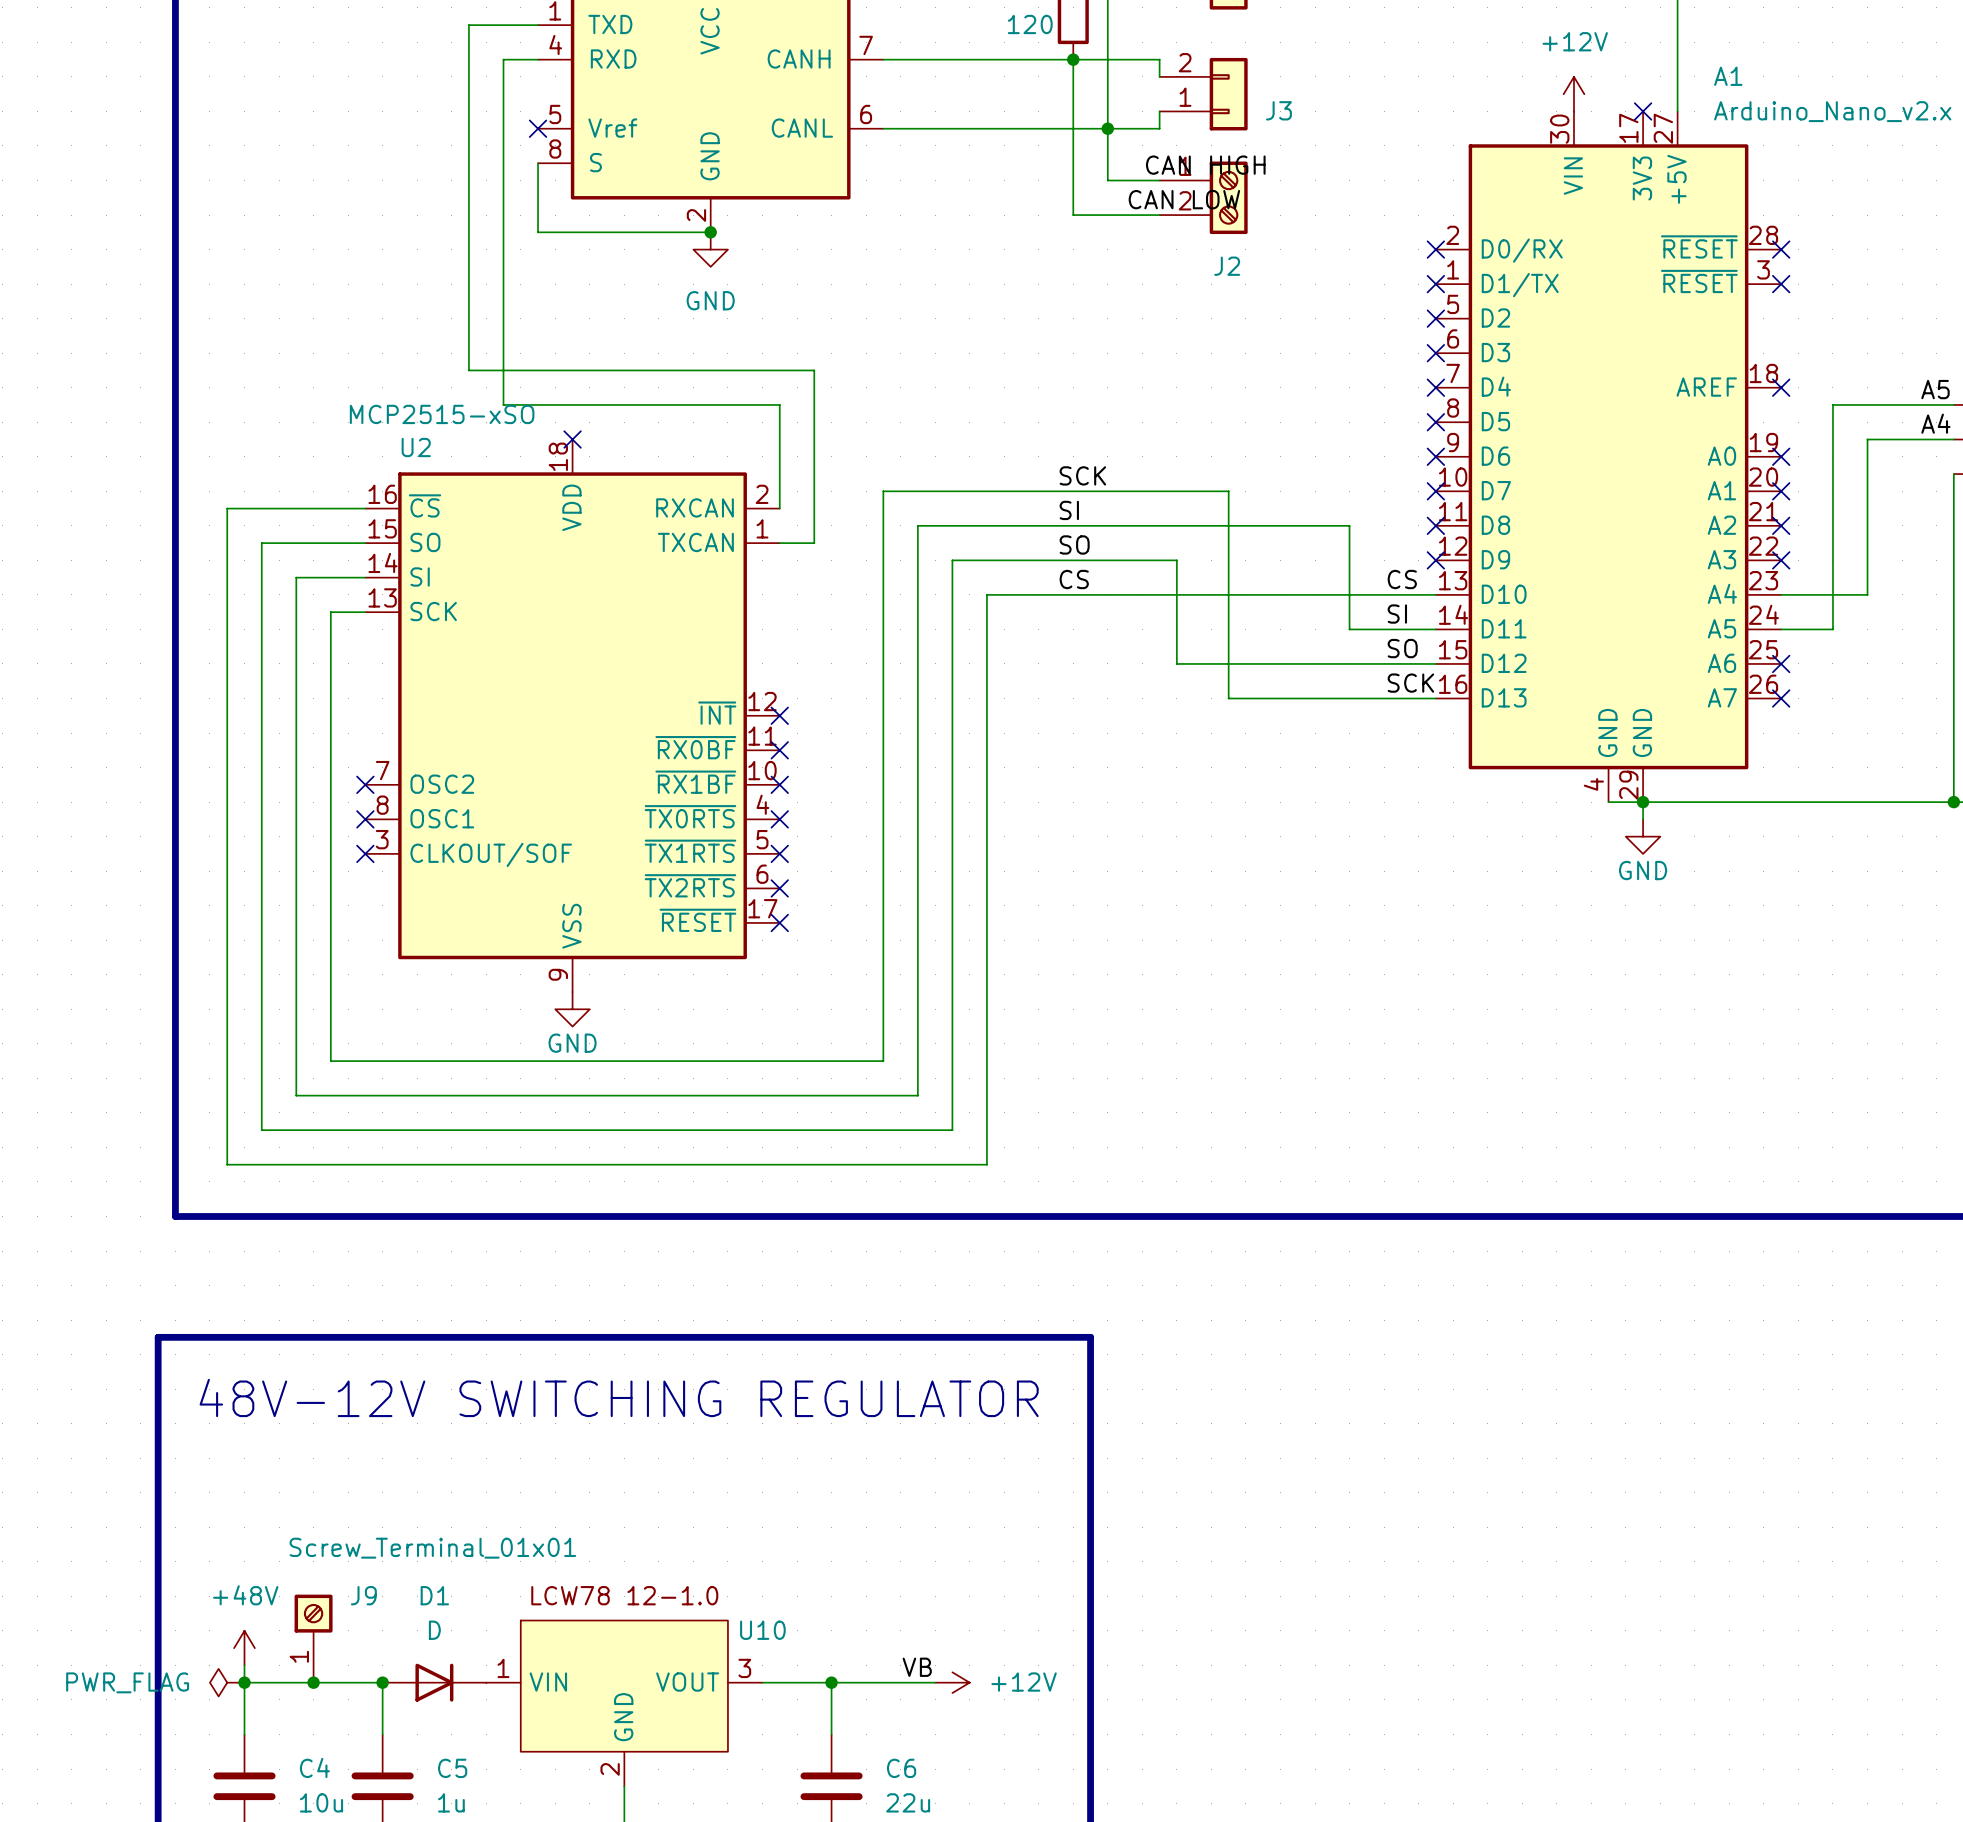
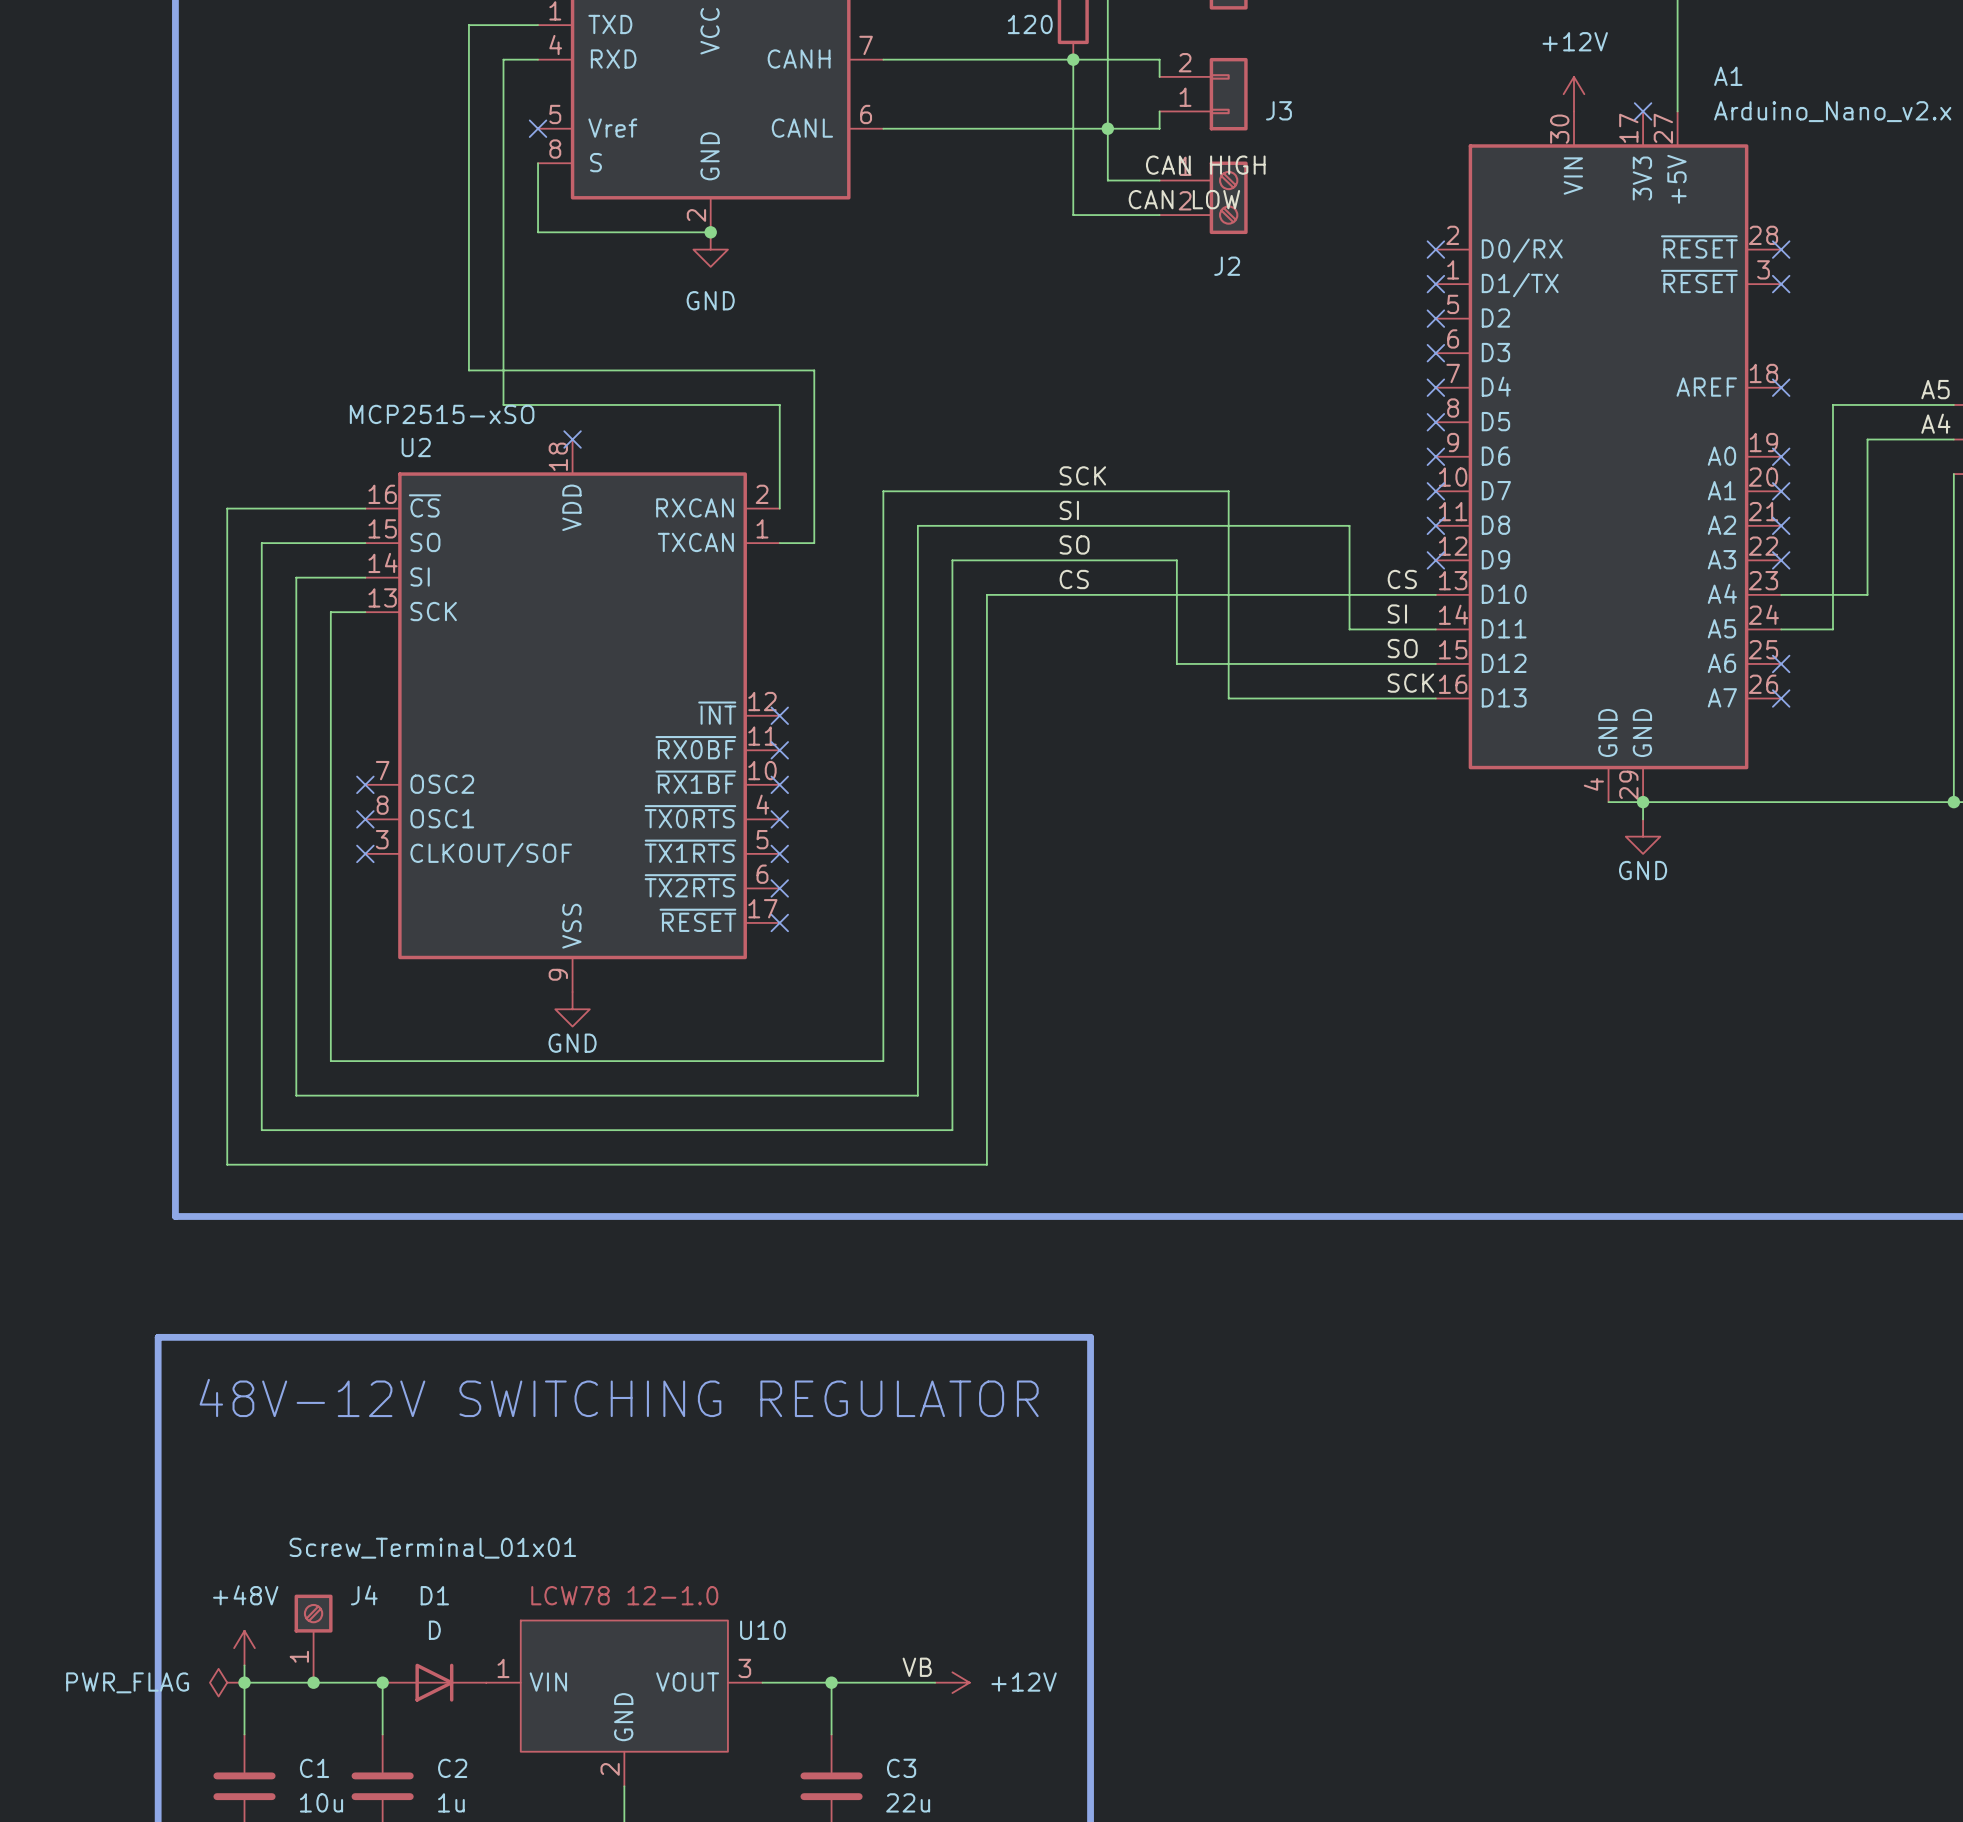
J9 name: J9 (363, 1595) -> J4 (364, 1595)
C4 name: C4 (314, 1767) -> C1 (314, 1768)
C5 name: C5 (452, 1768) -> C2 (452, 1768)
C6 name: C6 (901, 1768) -> C3 (901, 1768)

